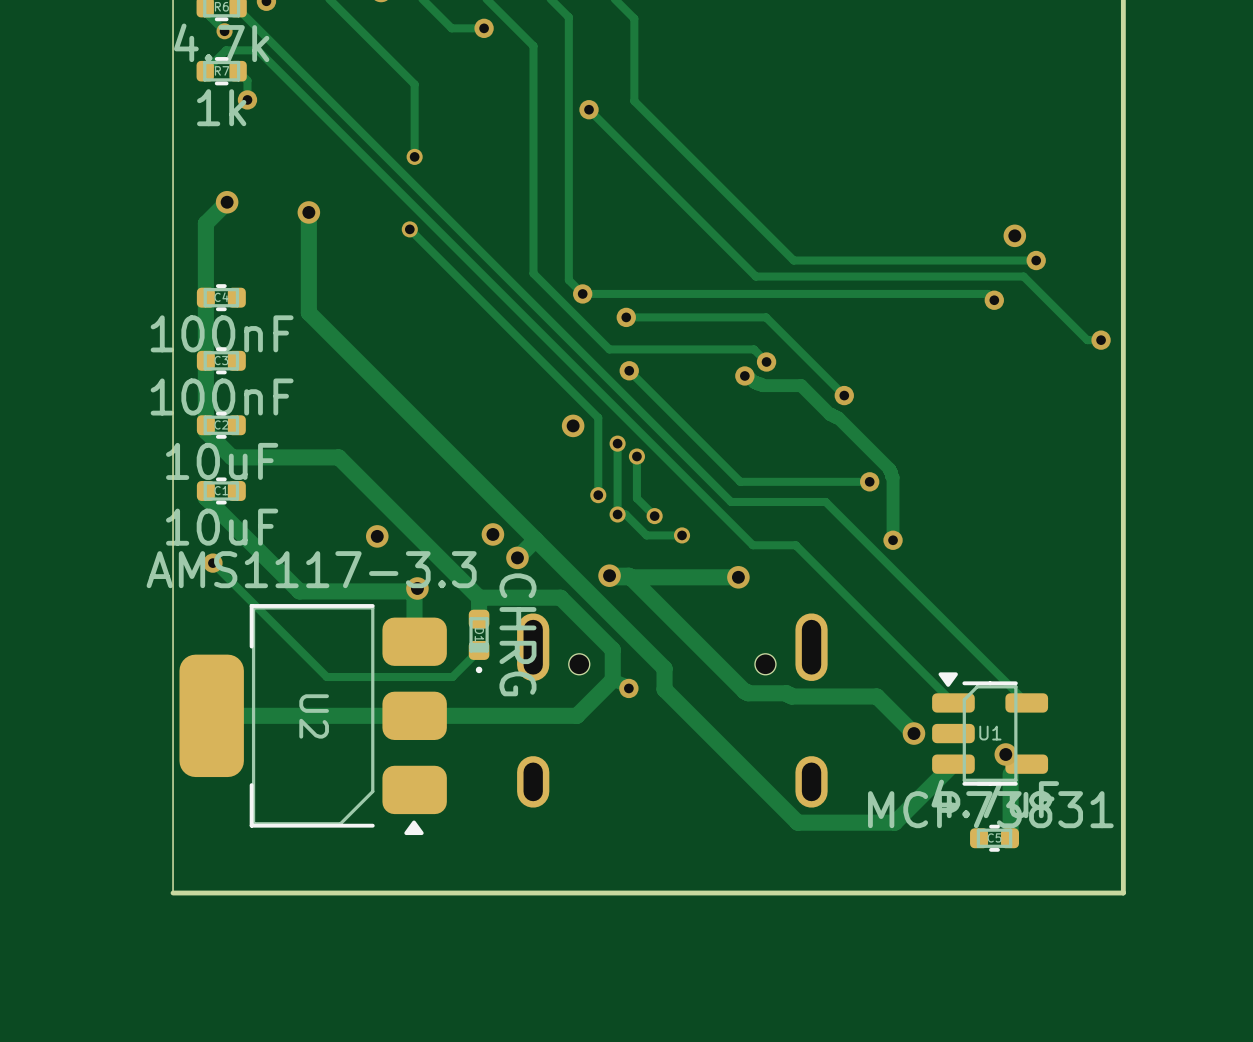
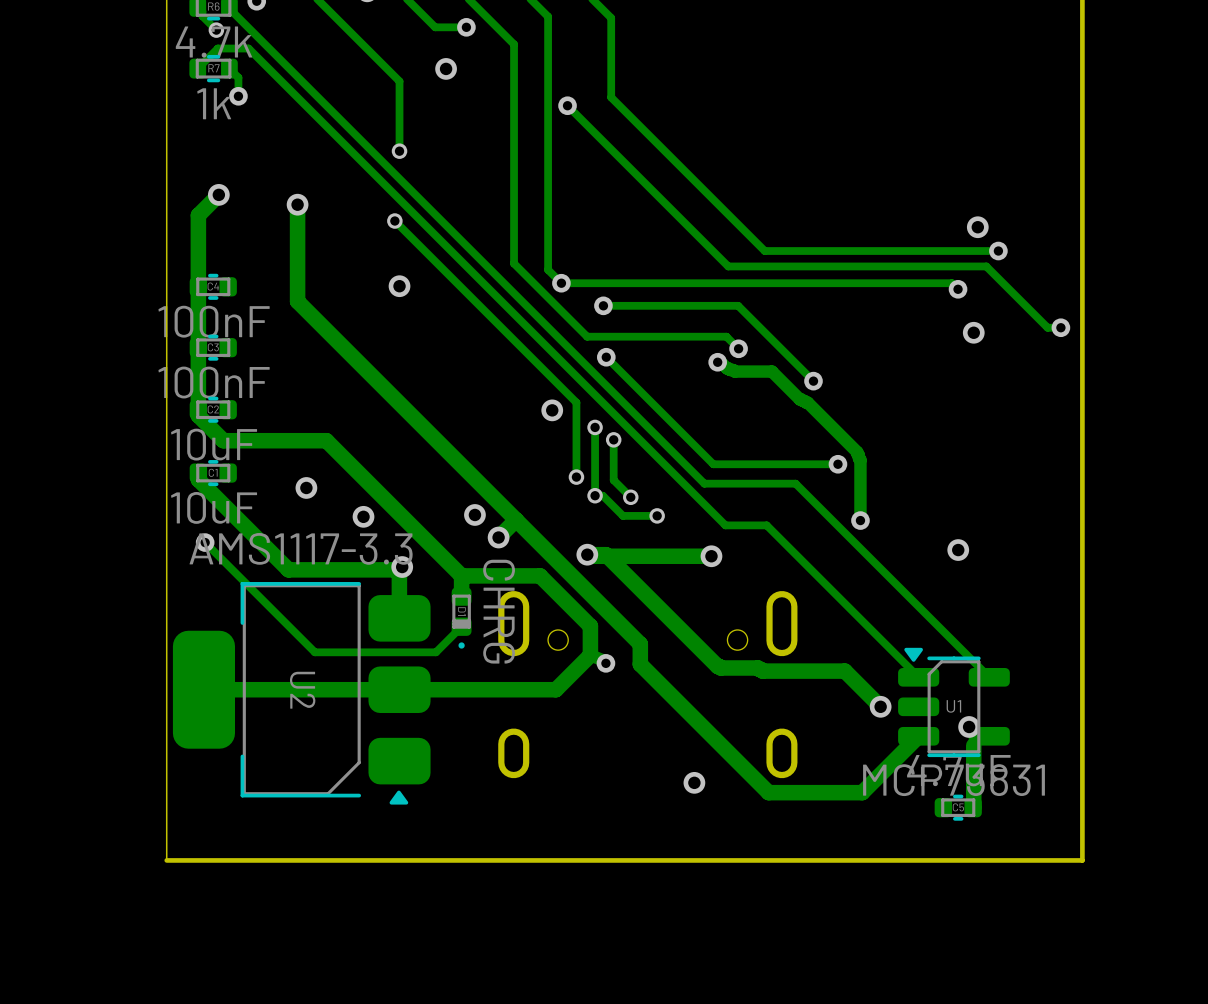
via: none -> (446, 68)
via: none -> (399, 286)
via: none -> (973, 332)
via: none -> (306, 487)
via: none -> (958, 550)
via: none -> (694, 782)

